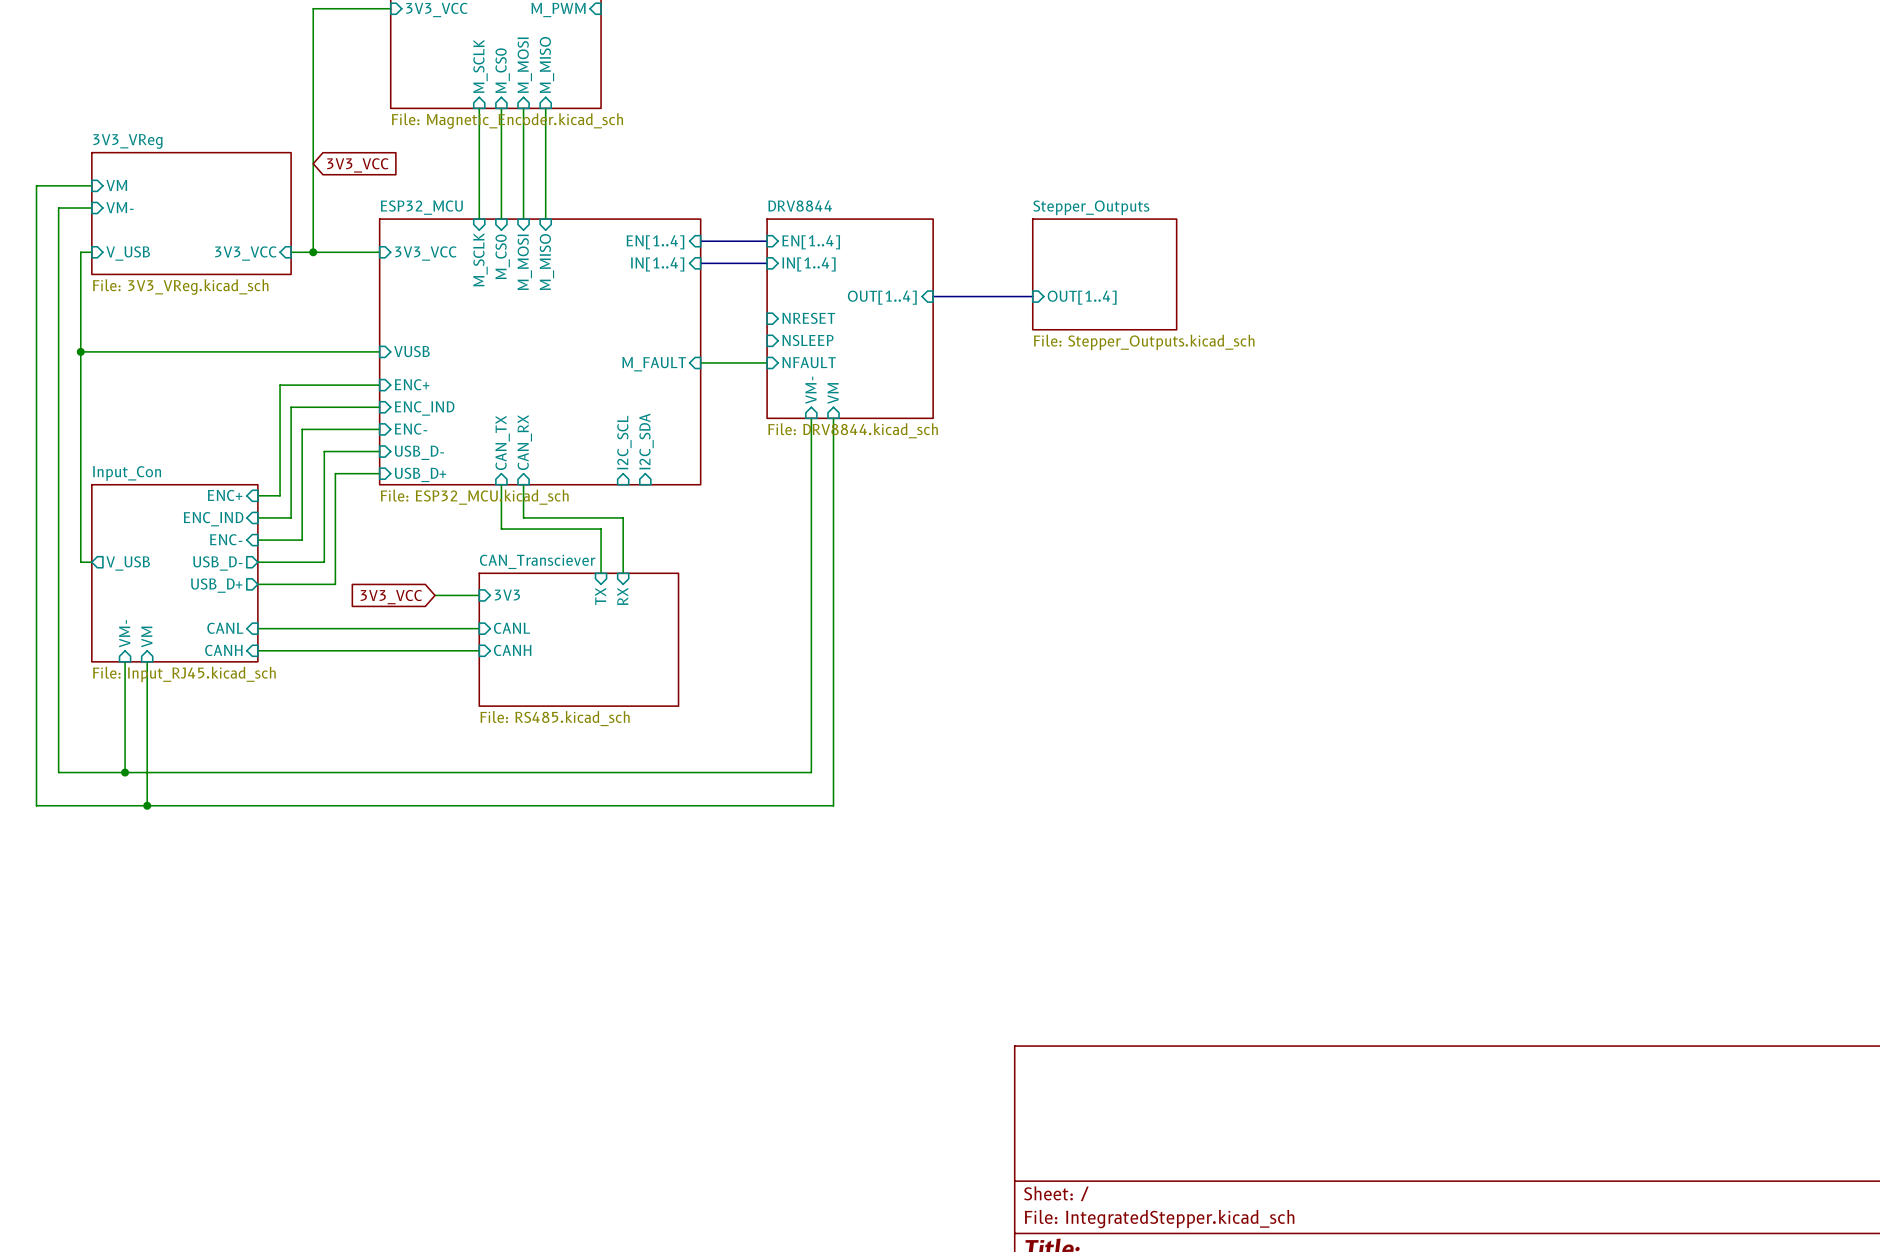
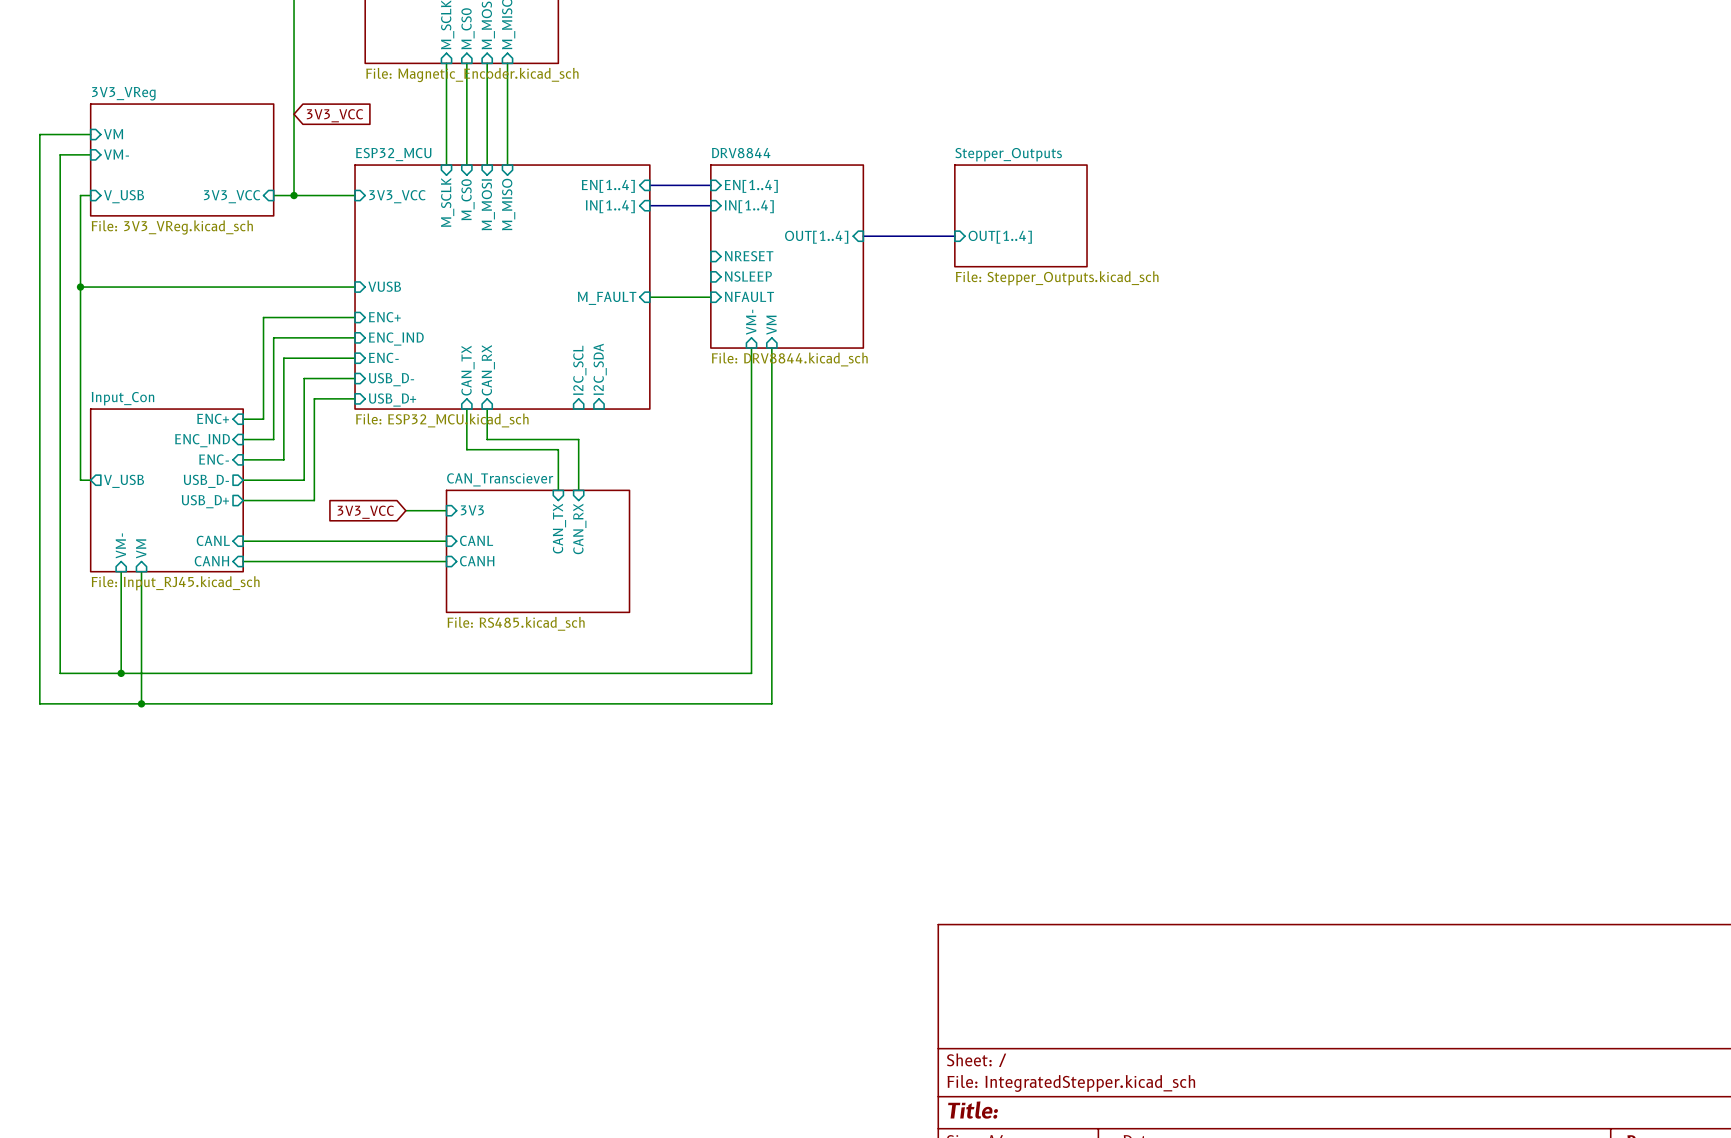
sheet pin: TX (600, 596) -> CAN_TX (559, 528)
sheet pin: RX (622, 596) -> CAN_RX (579, 528)

